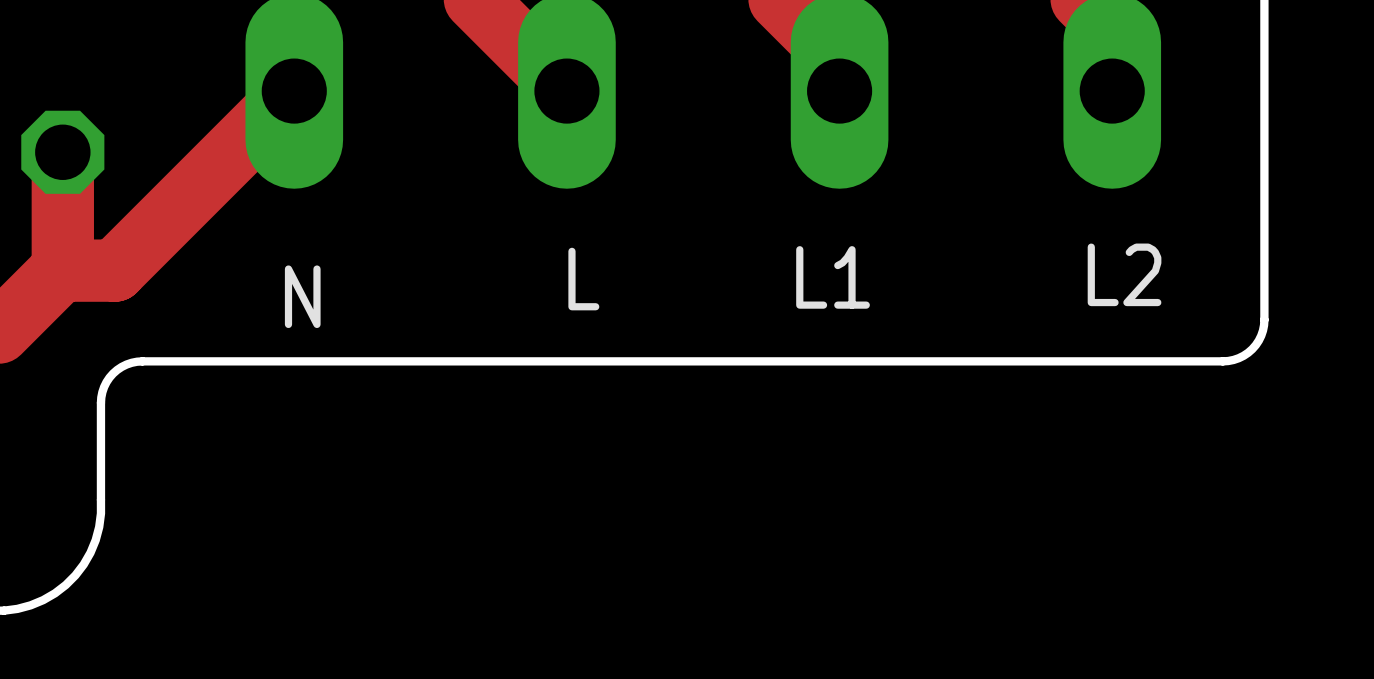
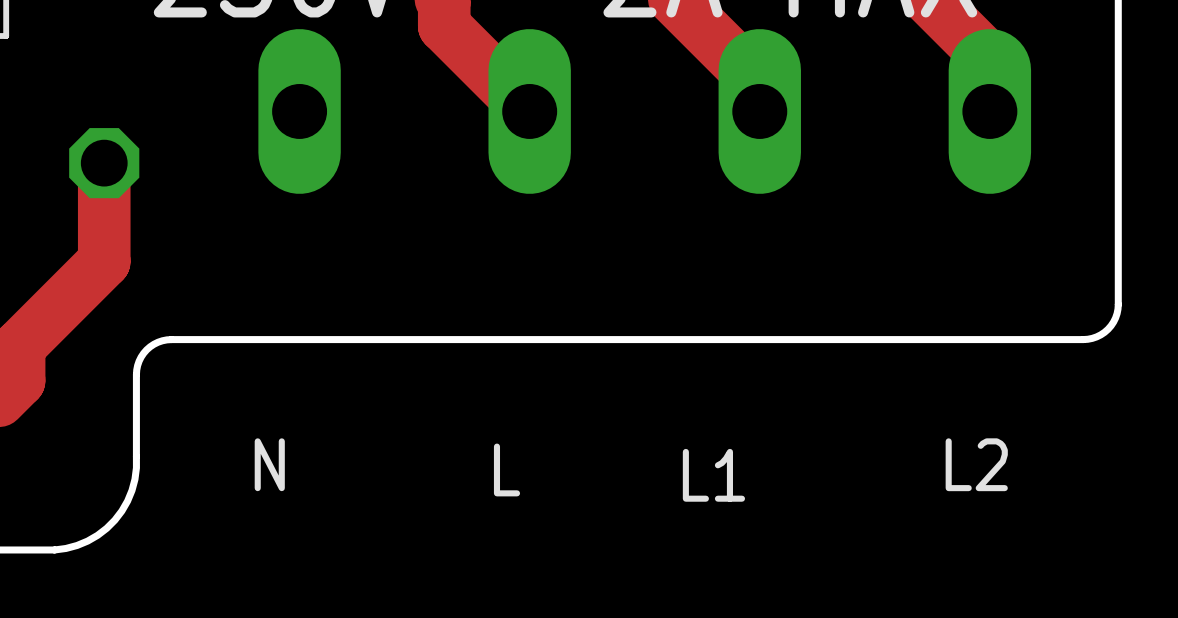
track: (294, 91) (114, 270) (60, 270) -> none
text position: L2 (1124, 274) -> L2 (976, 464)
text position: L1 (833, 277) -> L1 (713, 475)
text position: L (583, 279) -> L (507, 469)
text position: N (302, 296) -> N (269, 464)

